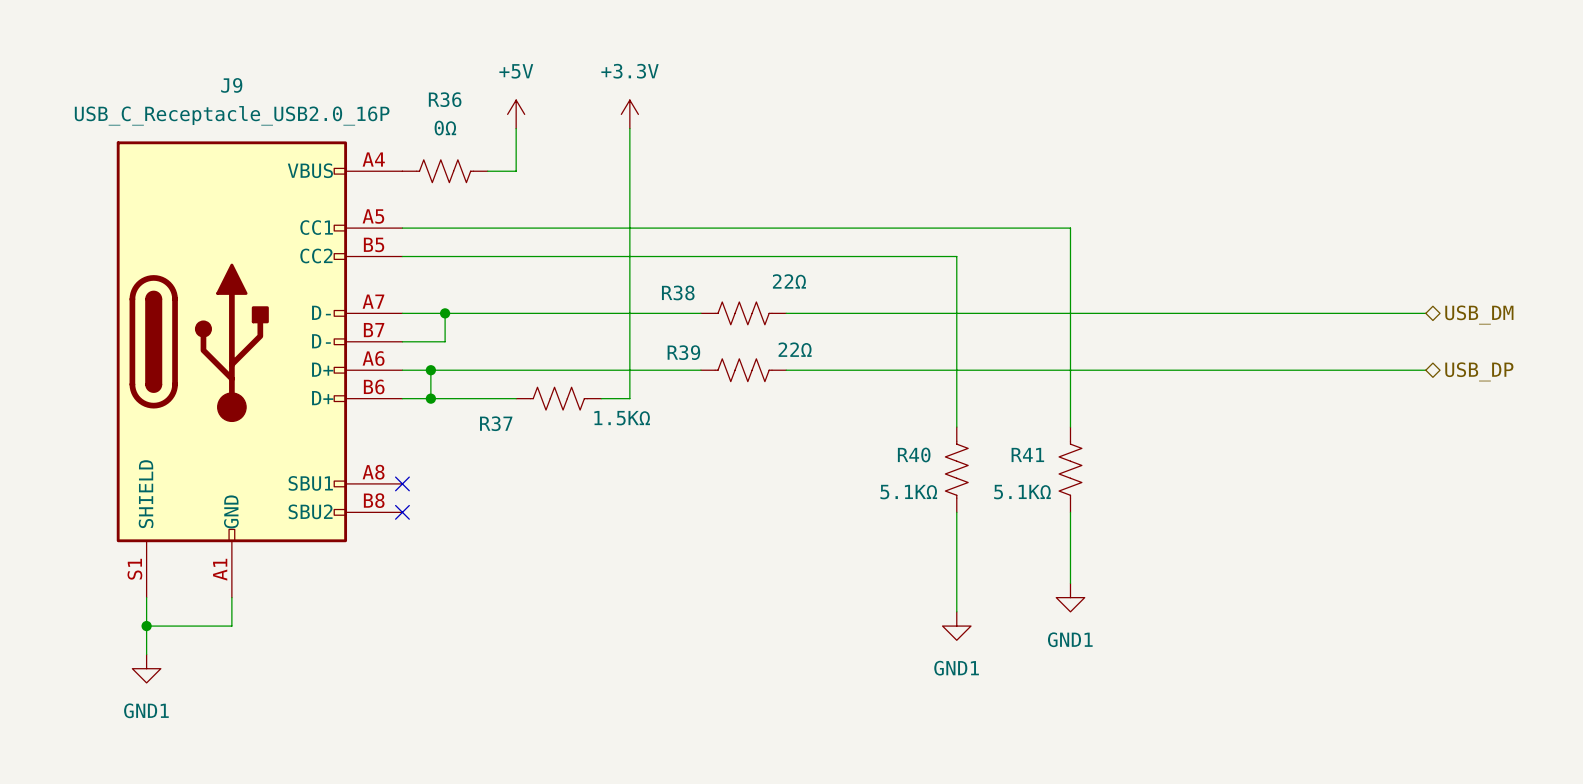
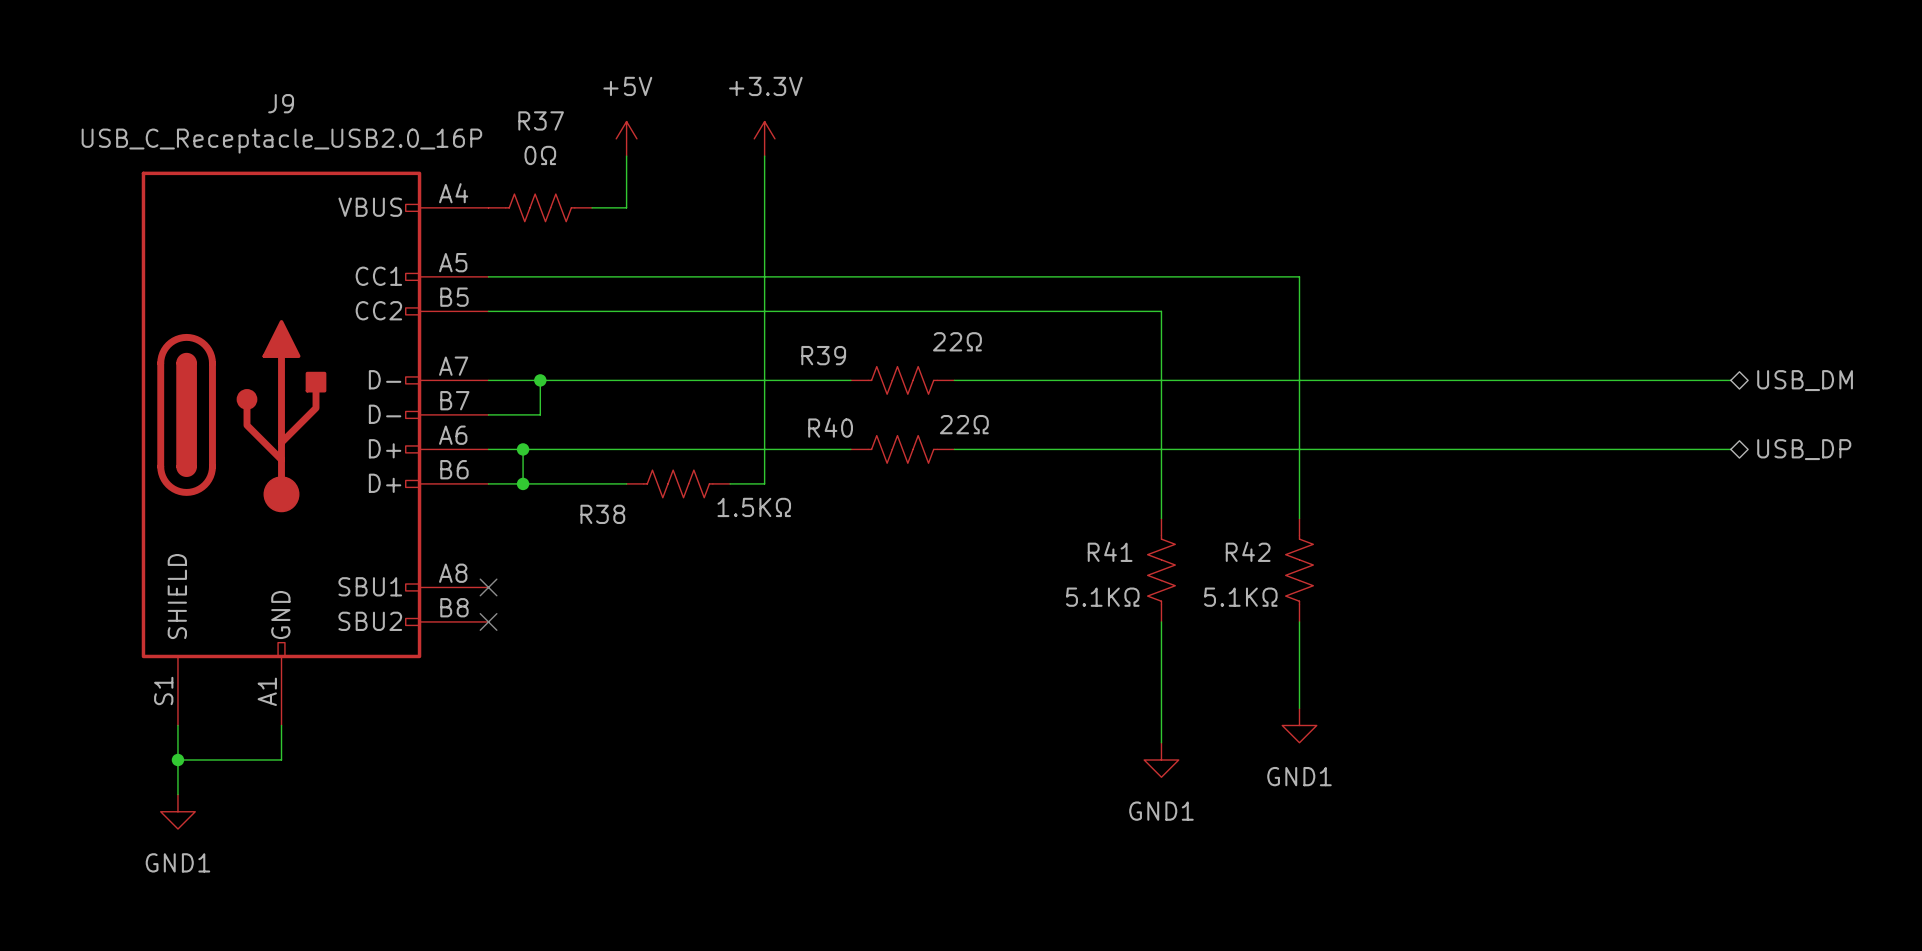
R36 name: R36 (445, 99) -> R37 (541, 120)
R38 name: R38 (678, 292) -> R39 (823, 355)
R39 name: R39 (683, 352) -> R40 (830, 427)
R37 name: R37 (496, 423) -> R38 (602, 514)
R40 name: R40 (914, 454) -> R41 (1110, 551)
R41 name: R41 (1027, 454) -> R42 (1248, 551)

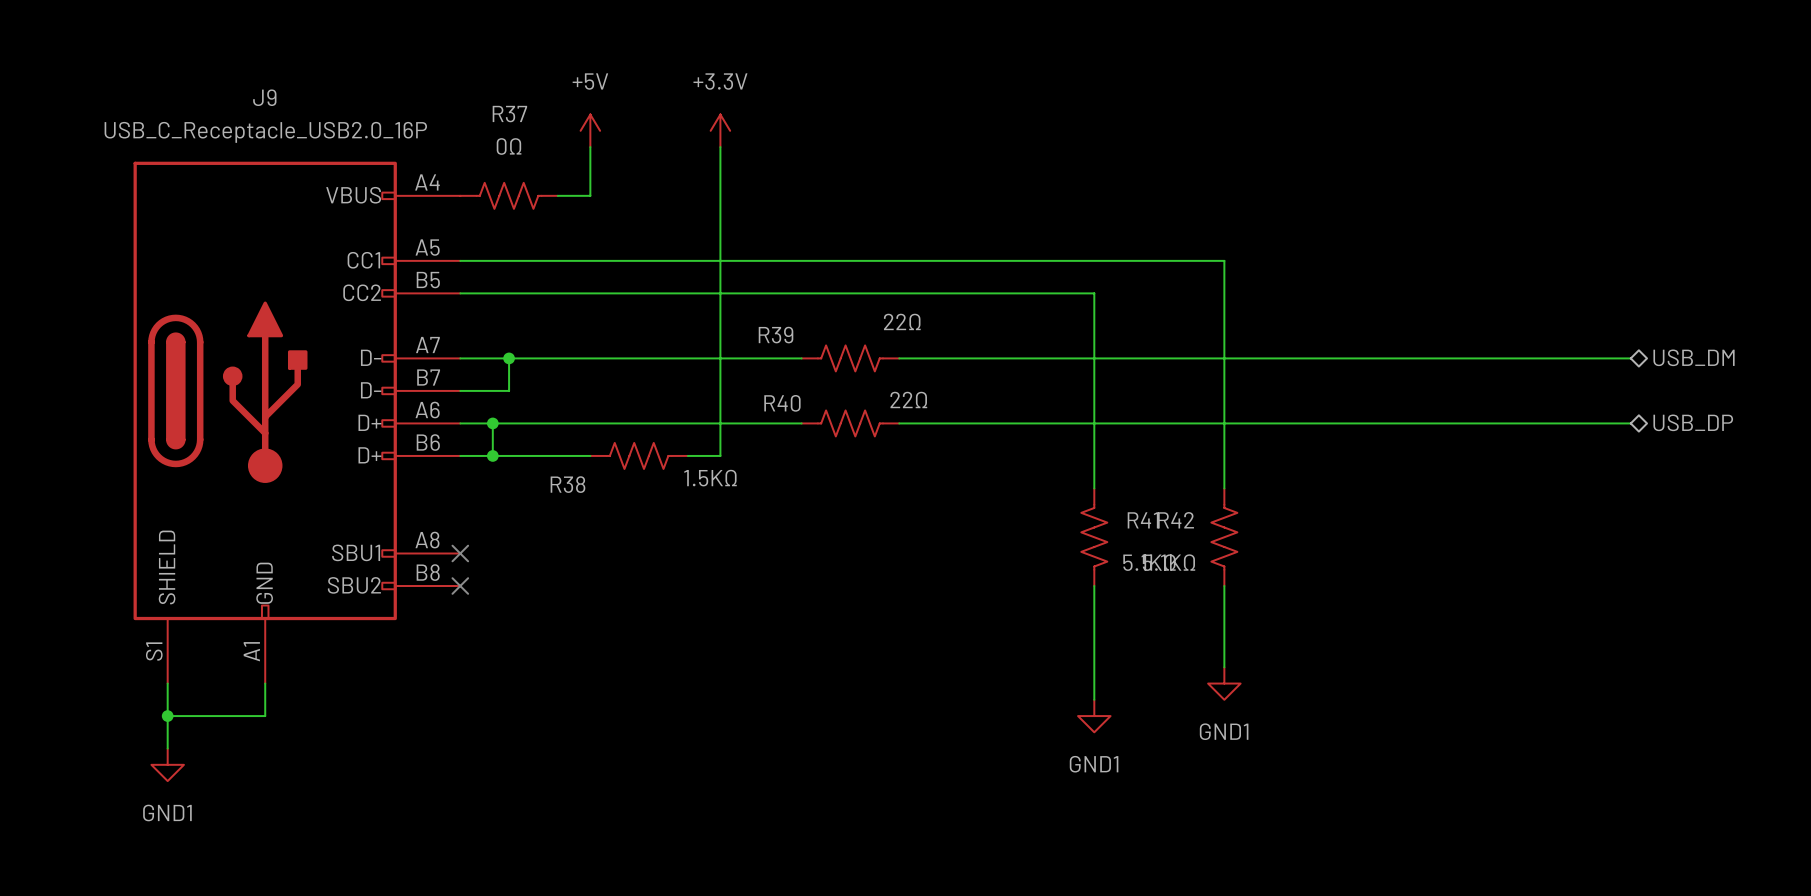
R41 flip: as is (1161, 570) -> left-right (1094, 537)

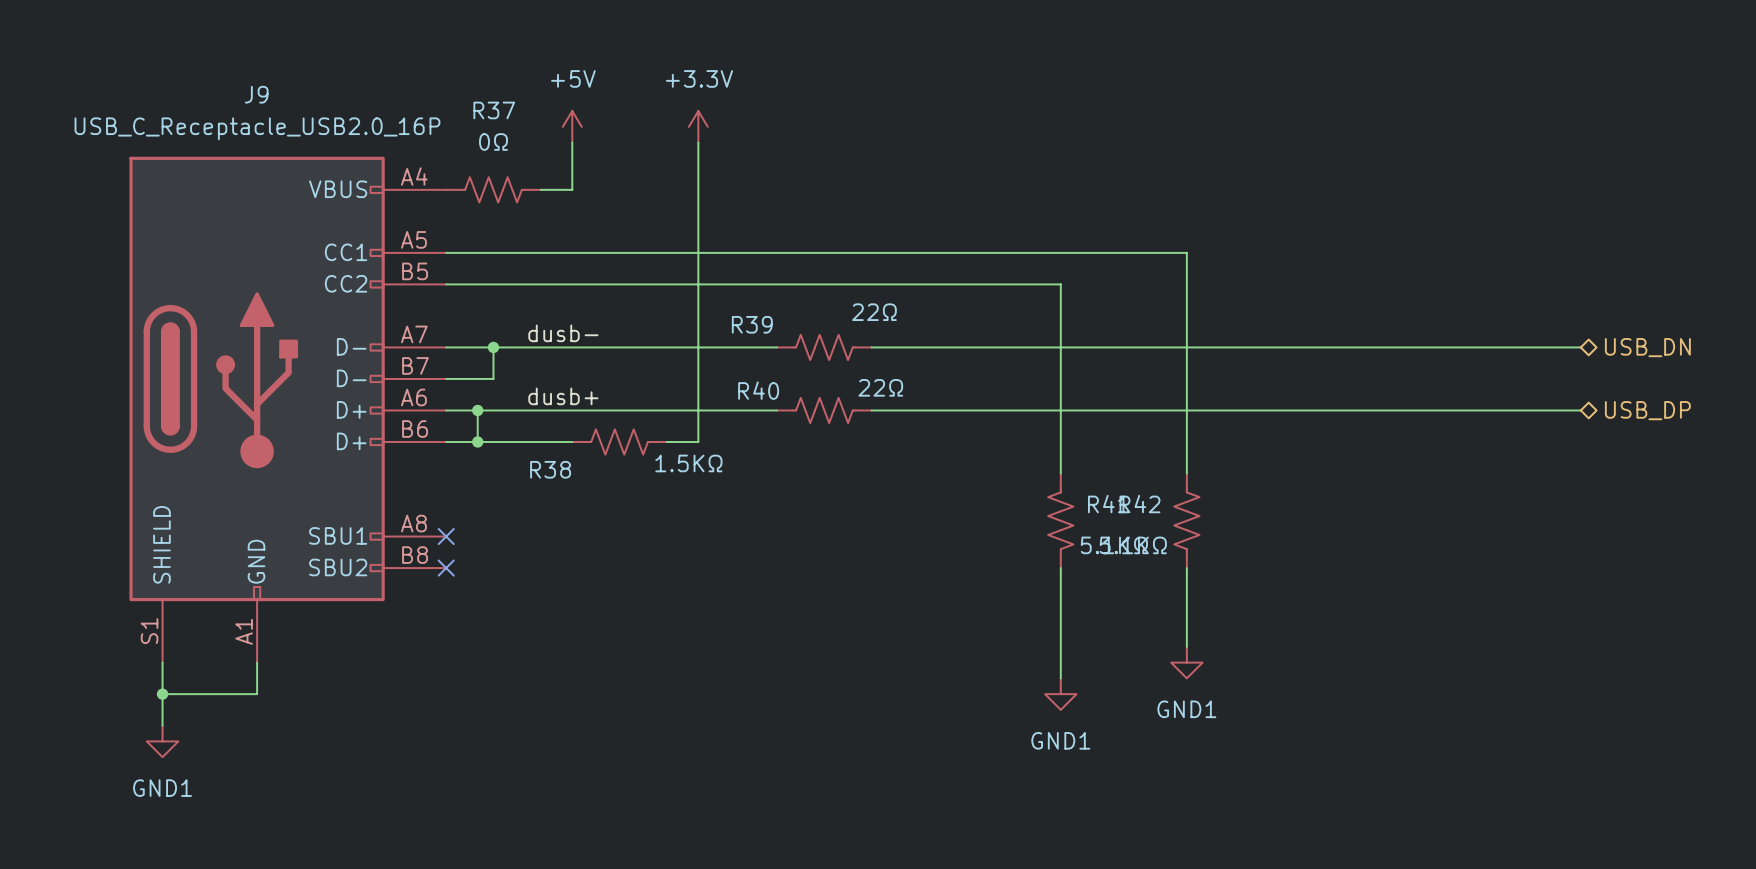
label: none -> dusb- (563, 333)
hierarchical label: USB_DM (1694, 357) -> USB_DN (1647, 347)
label: none -> dusb+ (563, 396)

